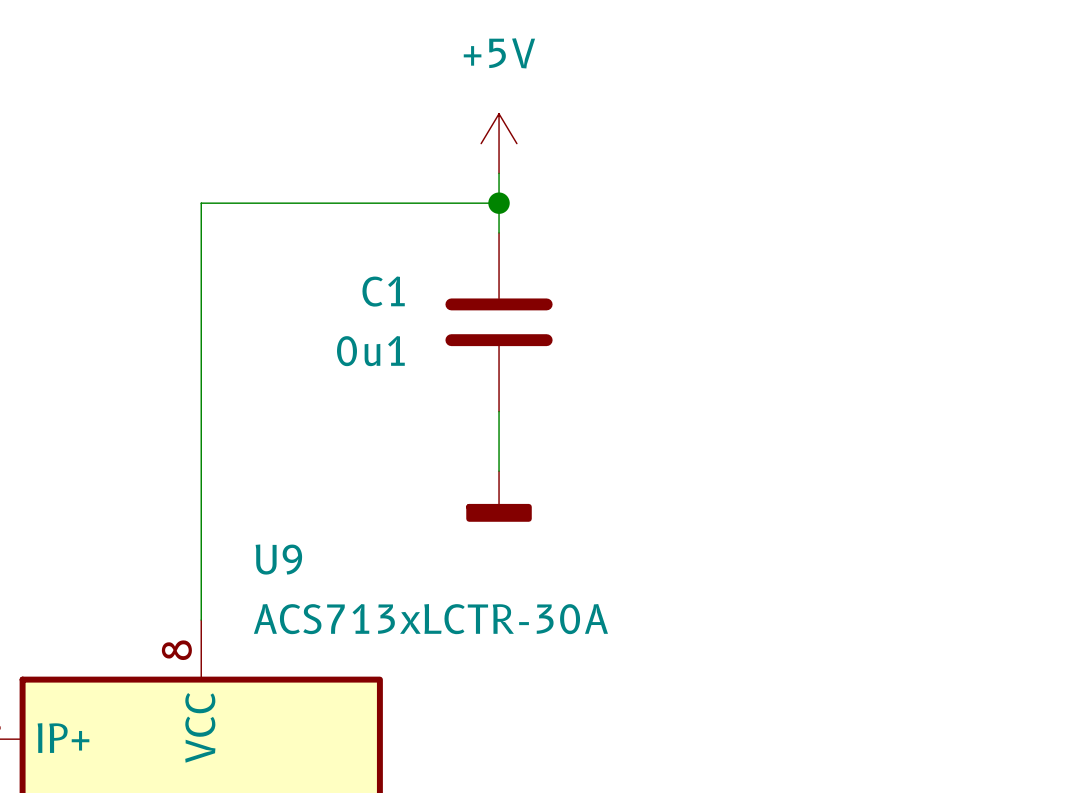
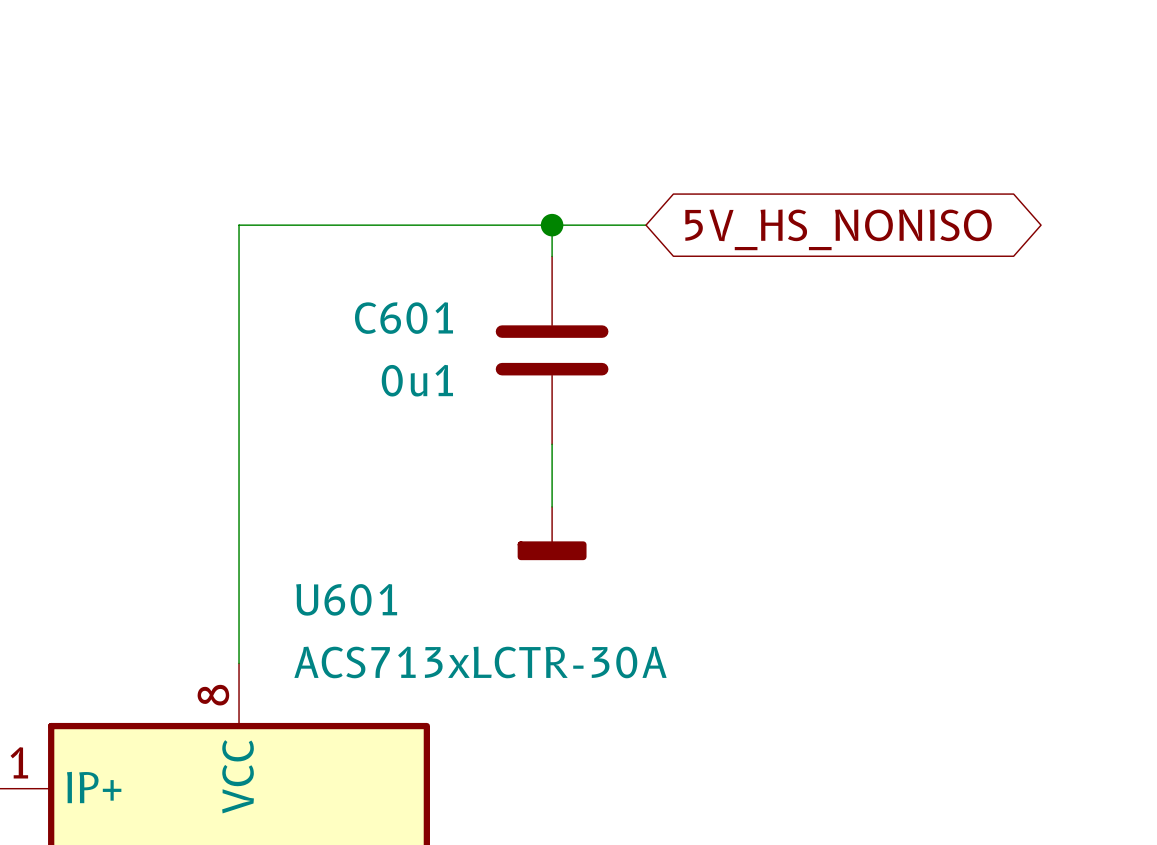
power symbol: +5V (499, 143) -> none
wire: (499, 173) (499, 203) -> (646, 225) (552, 225)
global label: none -> 5V_HS_NONISO (838, 229)
C1 name: C1 (383, 291) -> C601 (403, 318)
U9 name: U9 (278, 559) -> U601 (346, 599)

